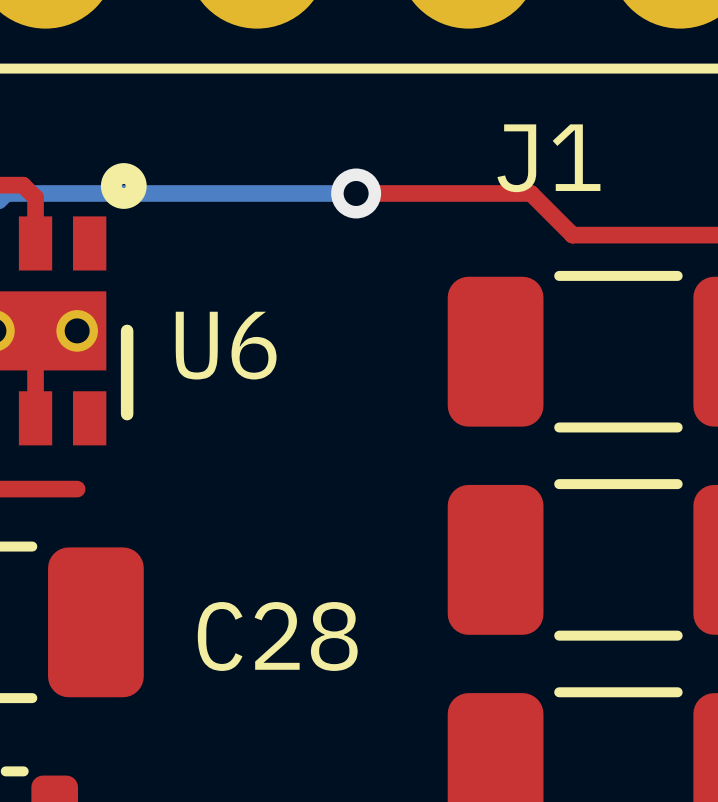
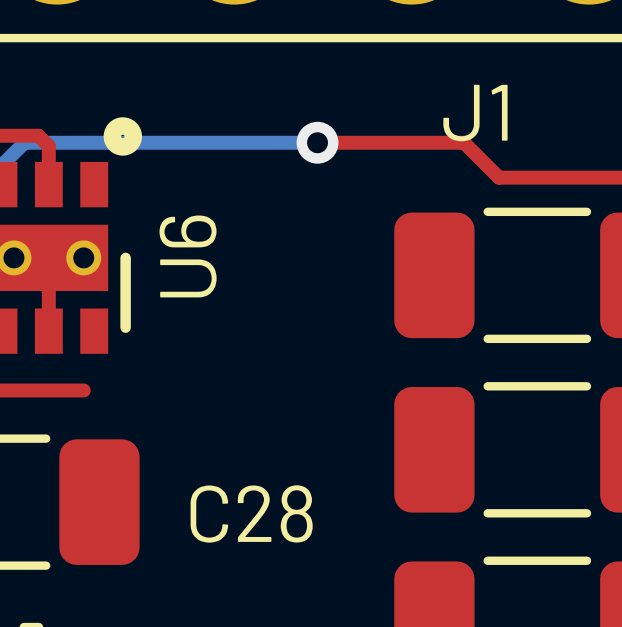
U6 name rotation: 0° (226, 345) -> 90° counterclockwise (188, 256)

